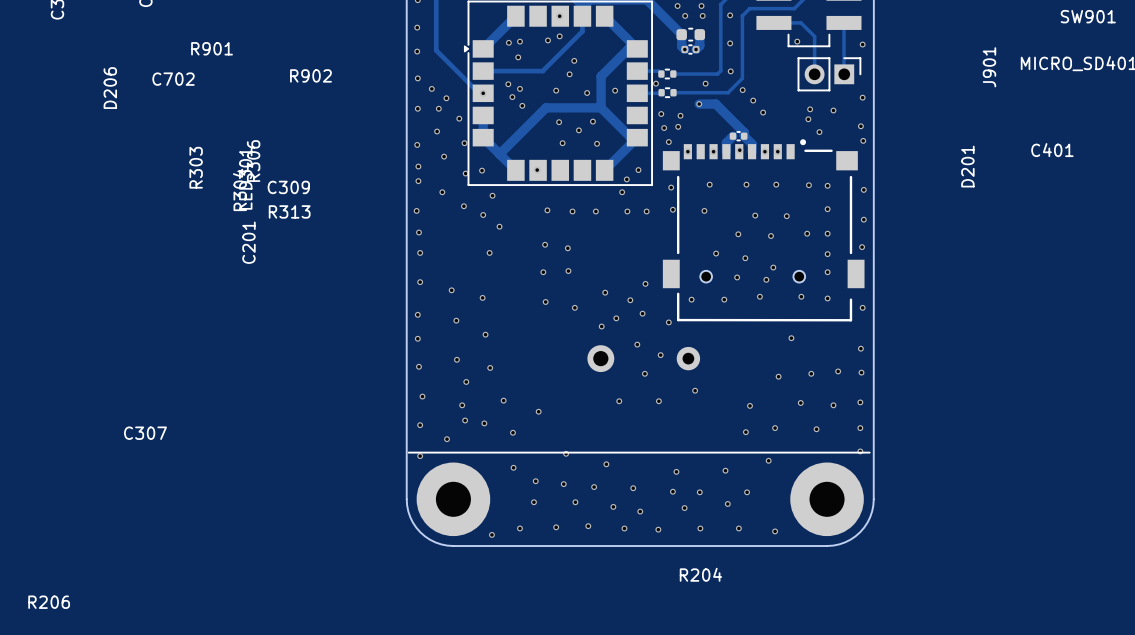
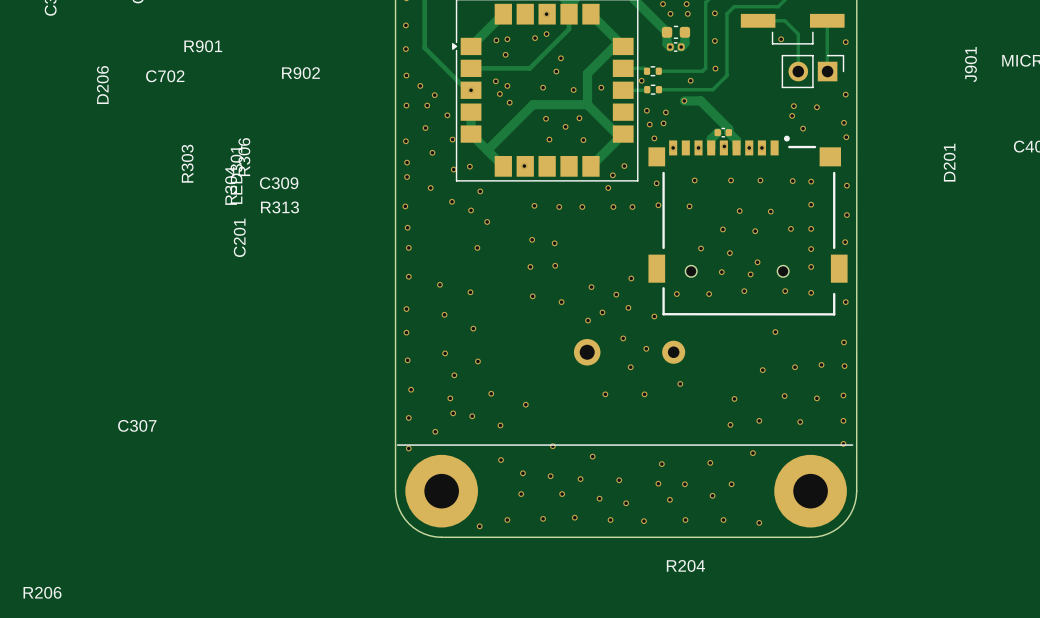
via: (742, 90) -> none
via: (753, 100) -> none
via: (763, 112) -> none

